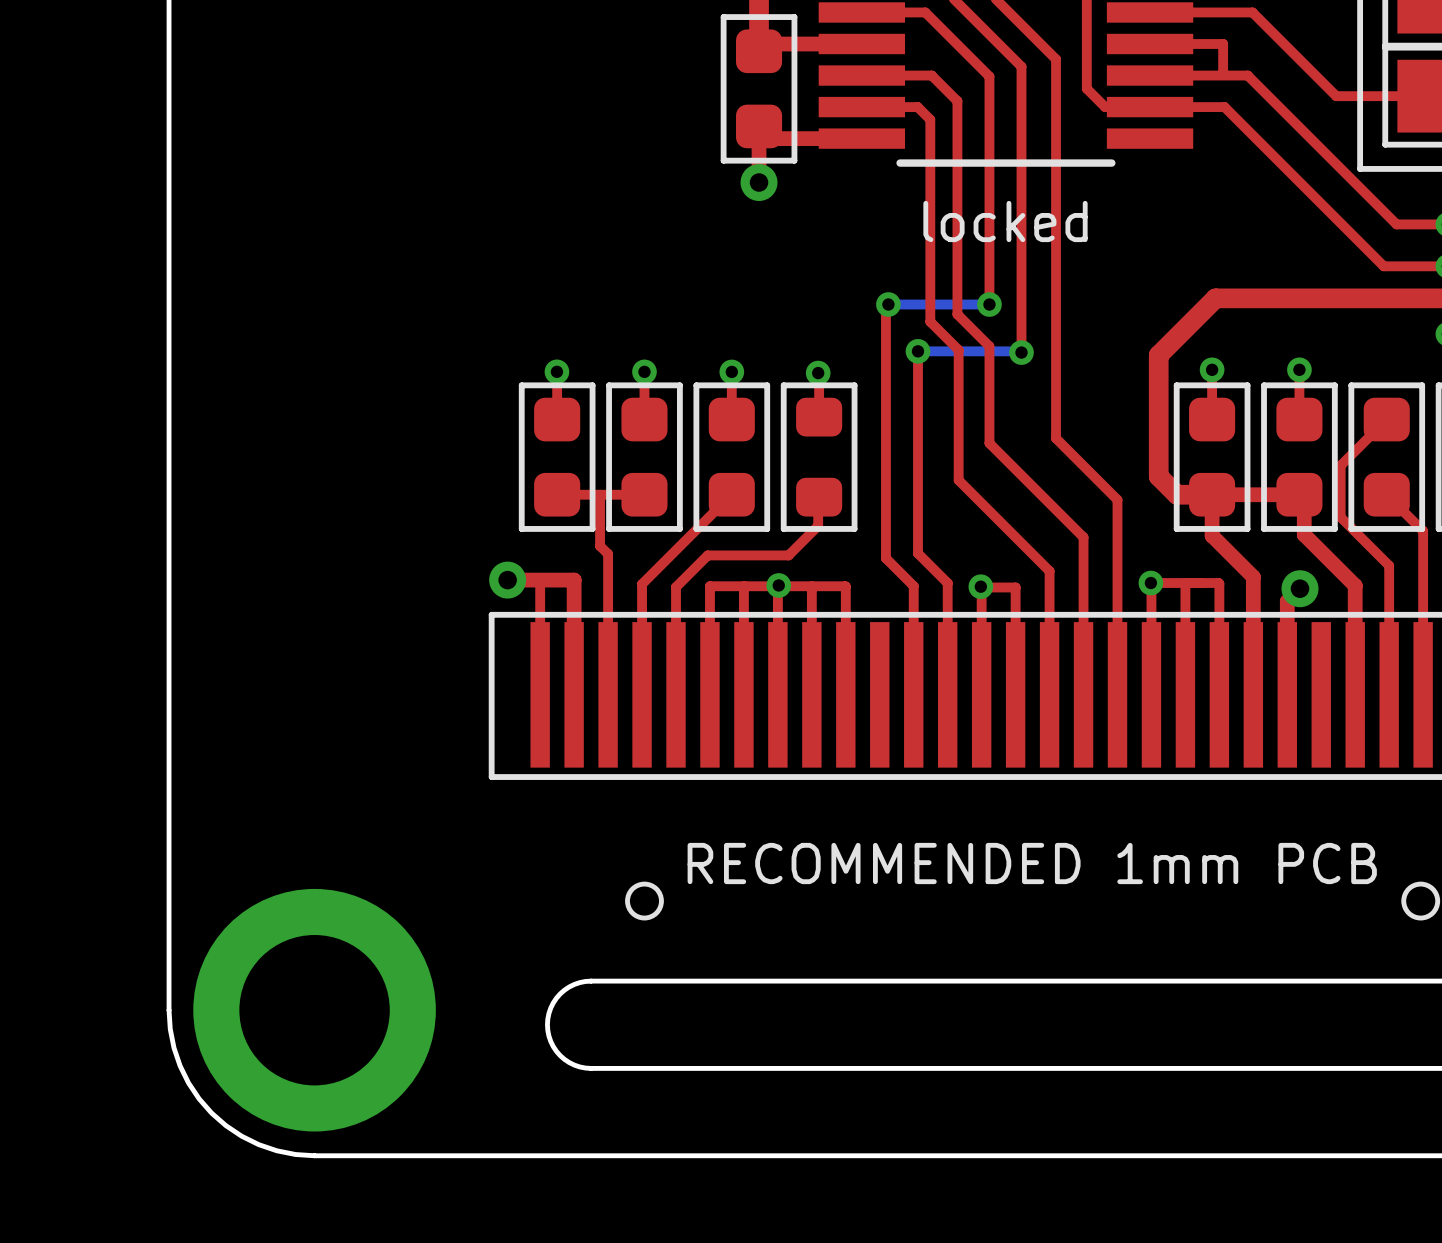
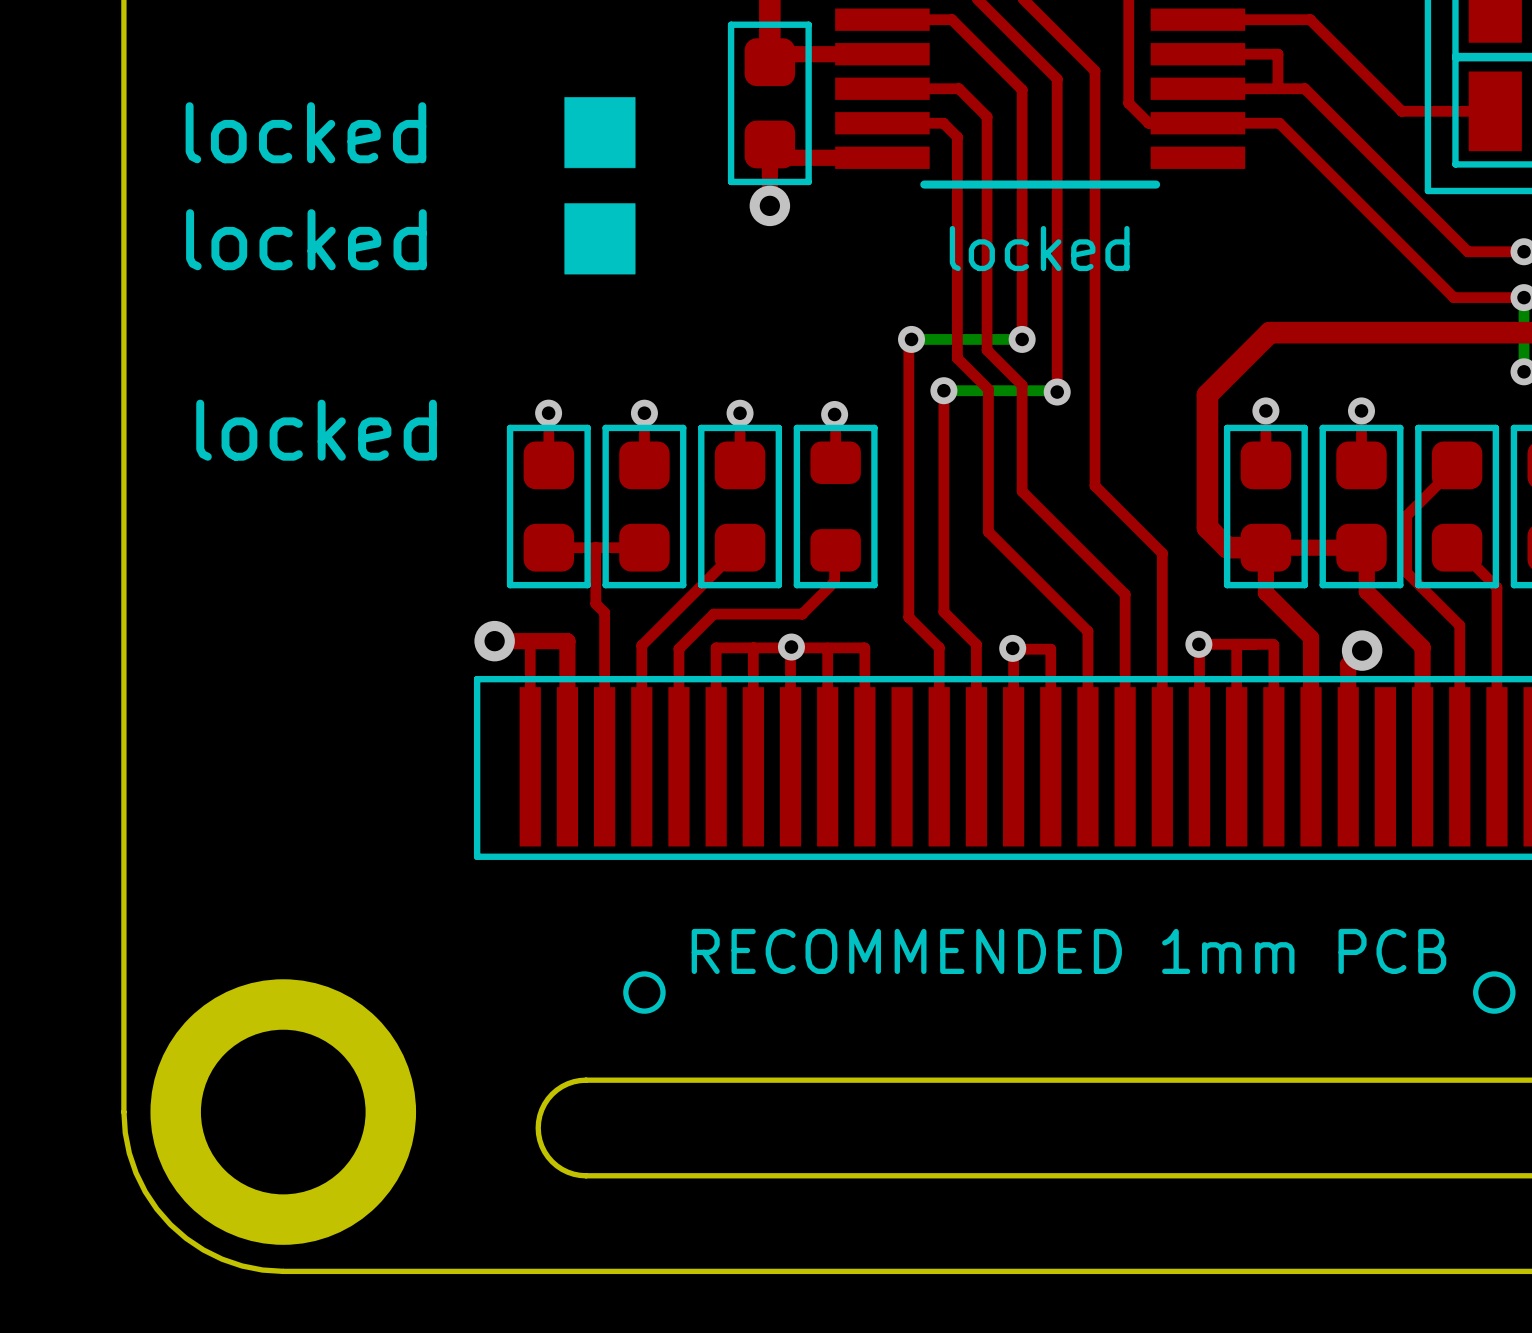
drawing: none -> [564, 97, 636, 275]
text: none -> locked (305, 132)
text: none -> locked (306, 239)
text: none -> locked (316, 430)

